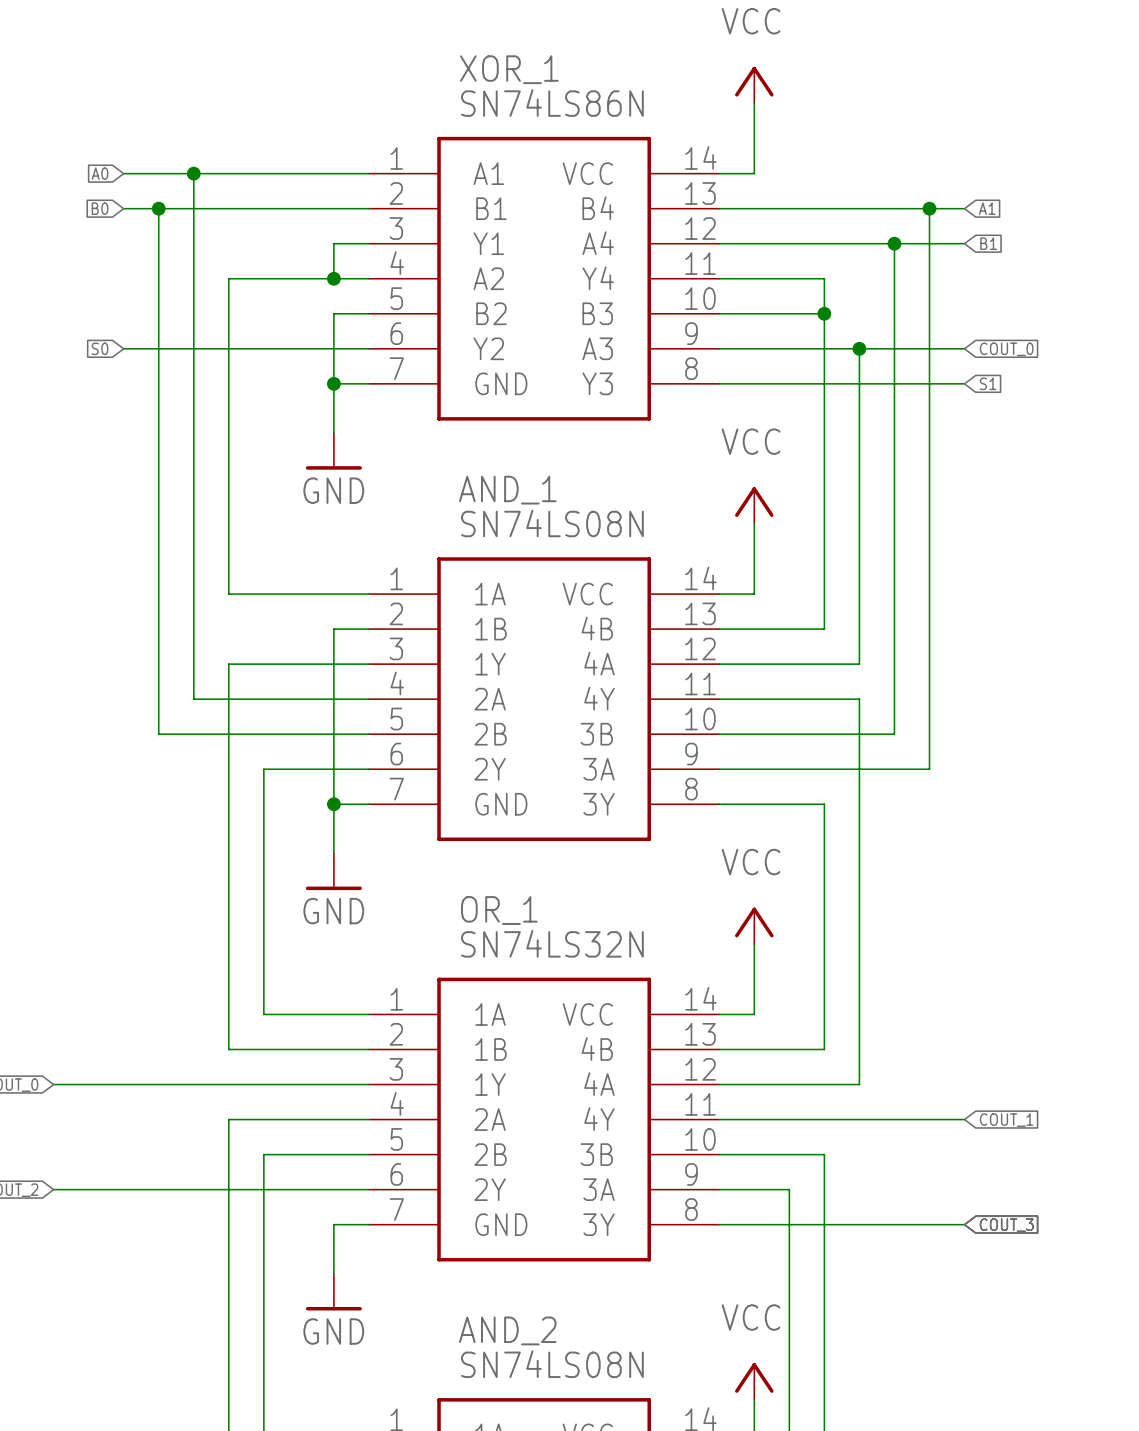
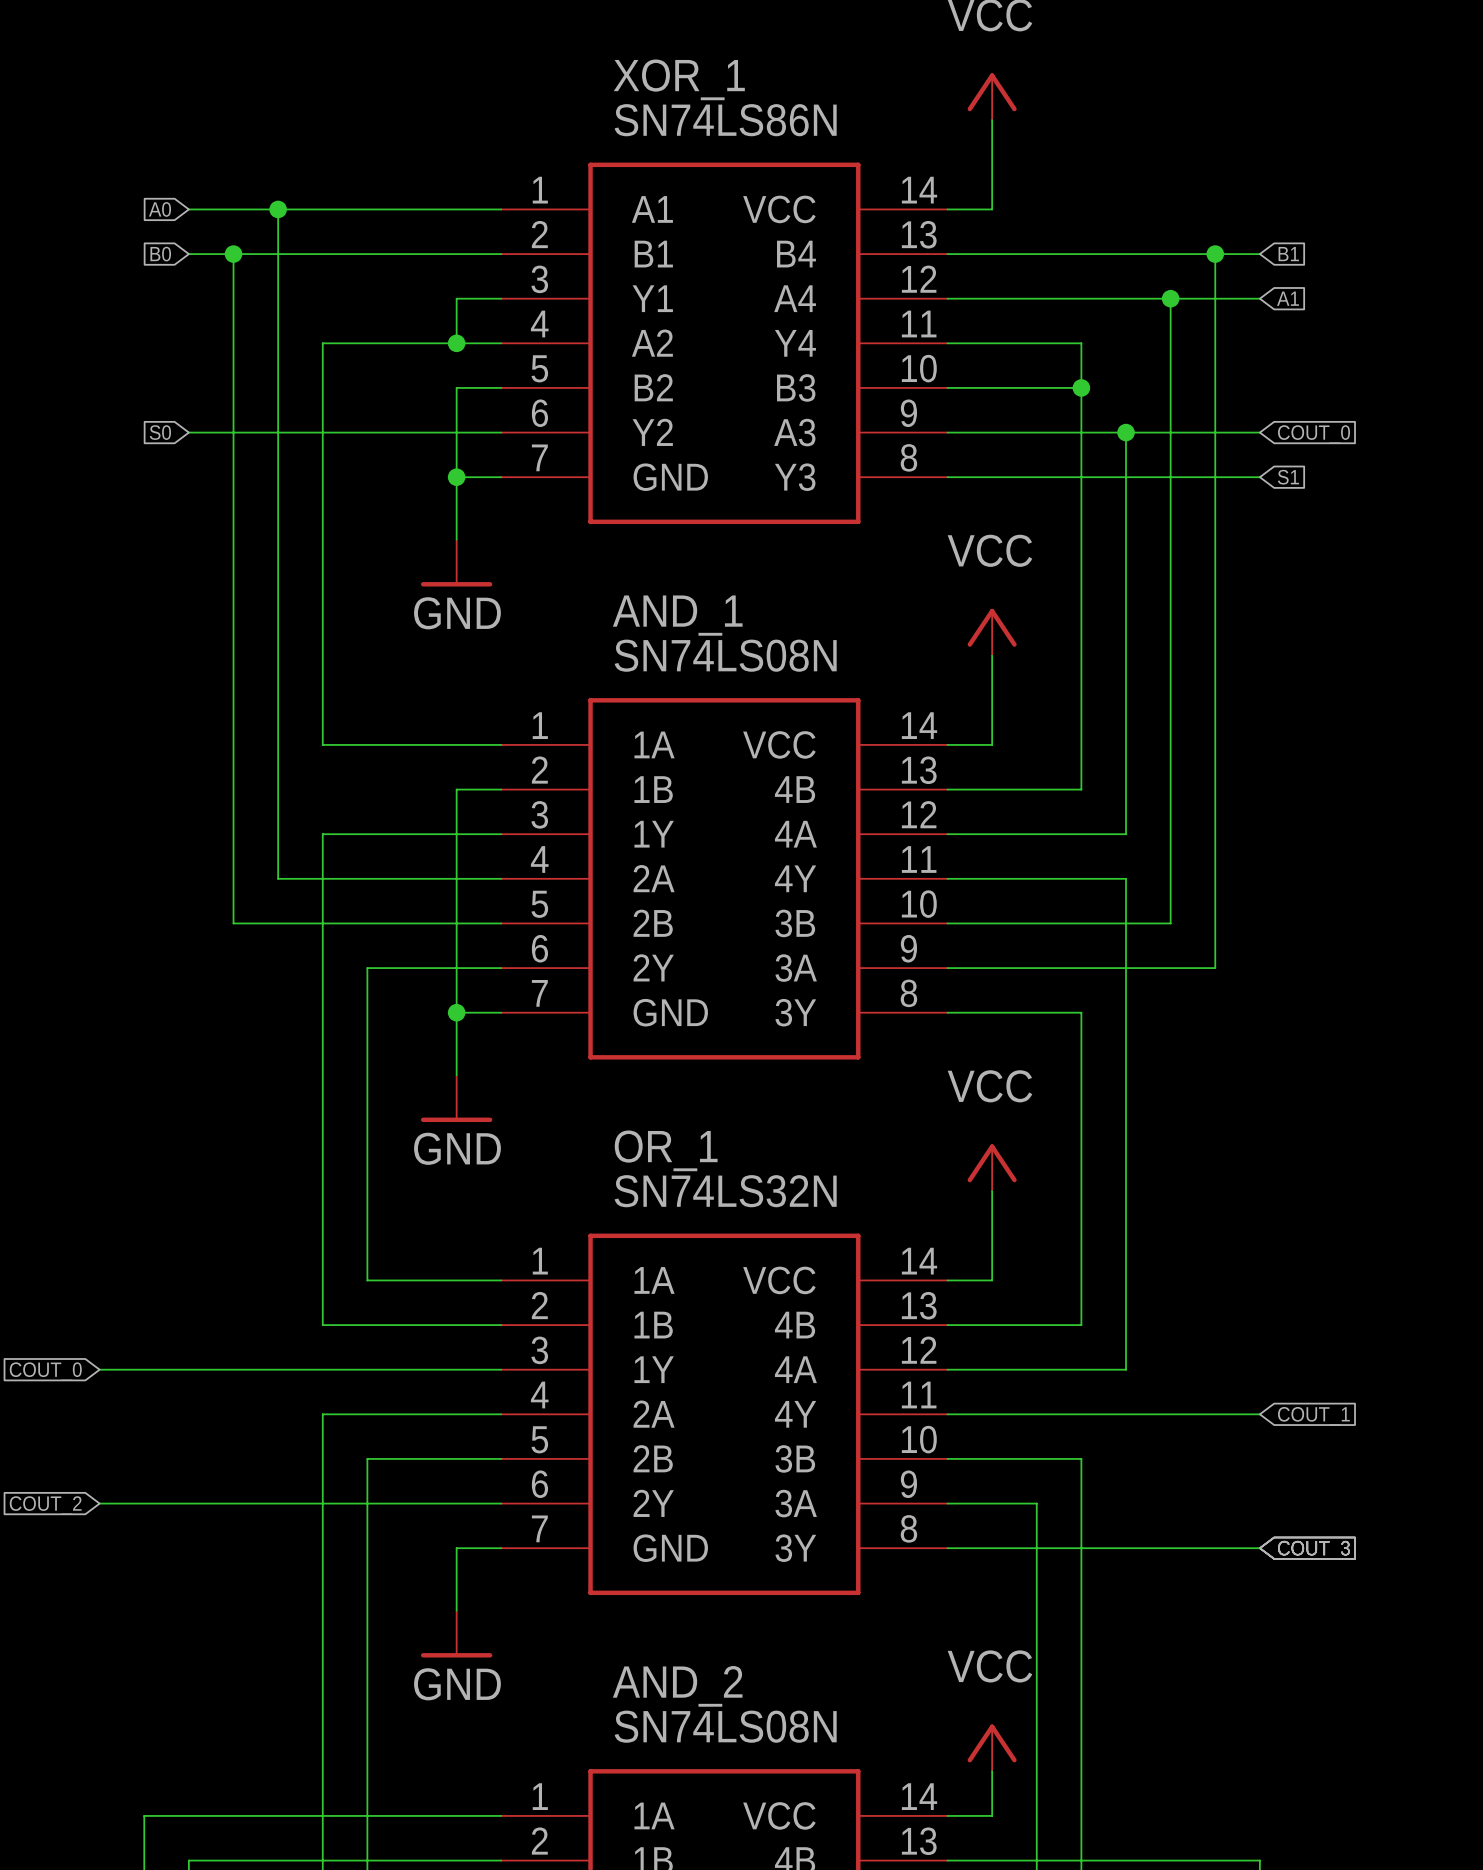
global label: A1 (987, 208) -> B1 (1288, 254)
global label: B1 (988, 243) -> A1 (1288, 298)

